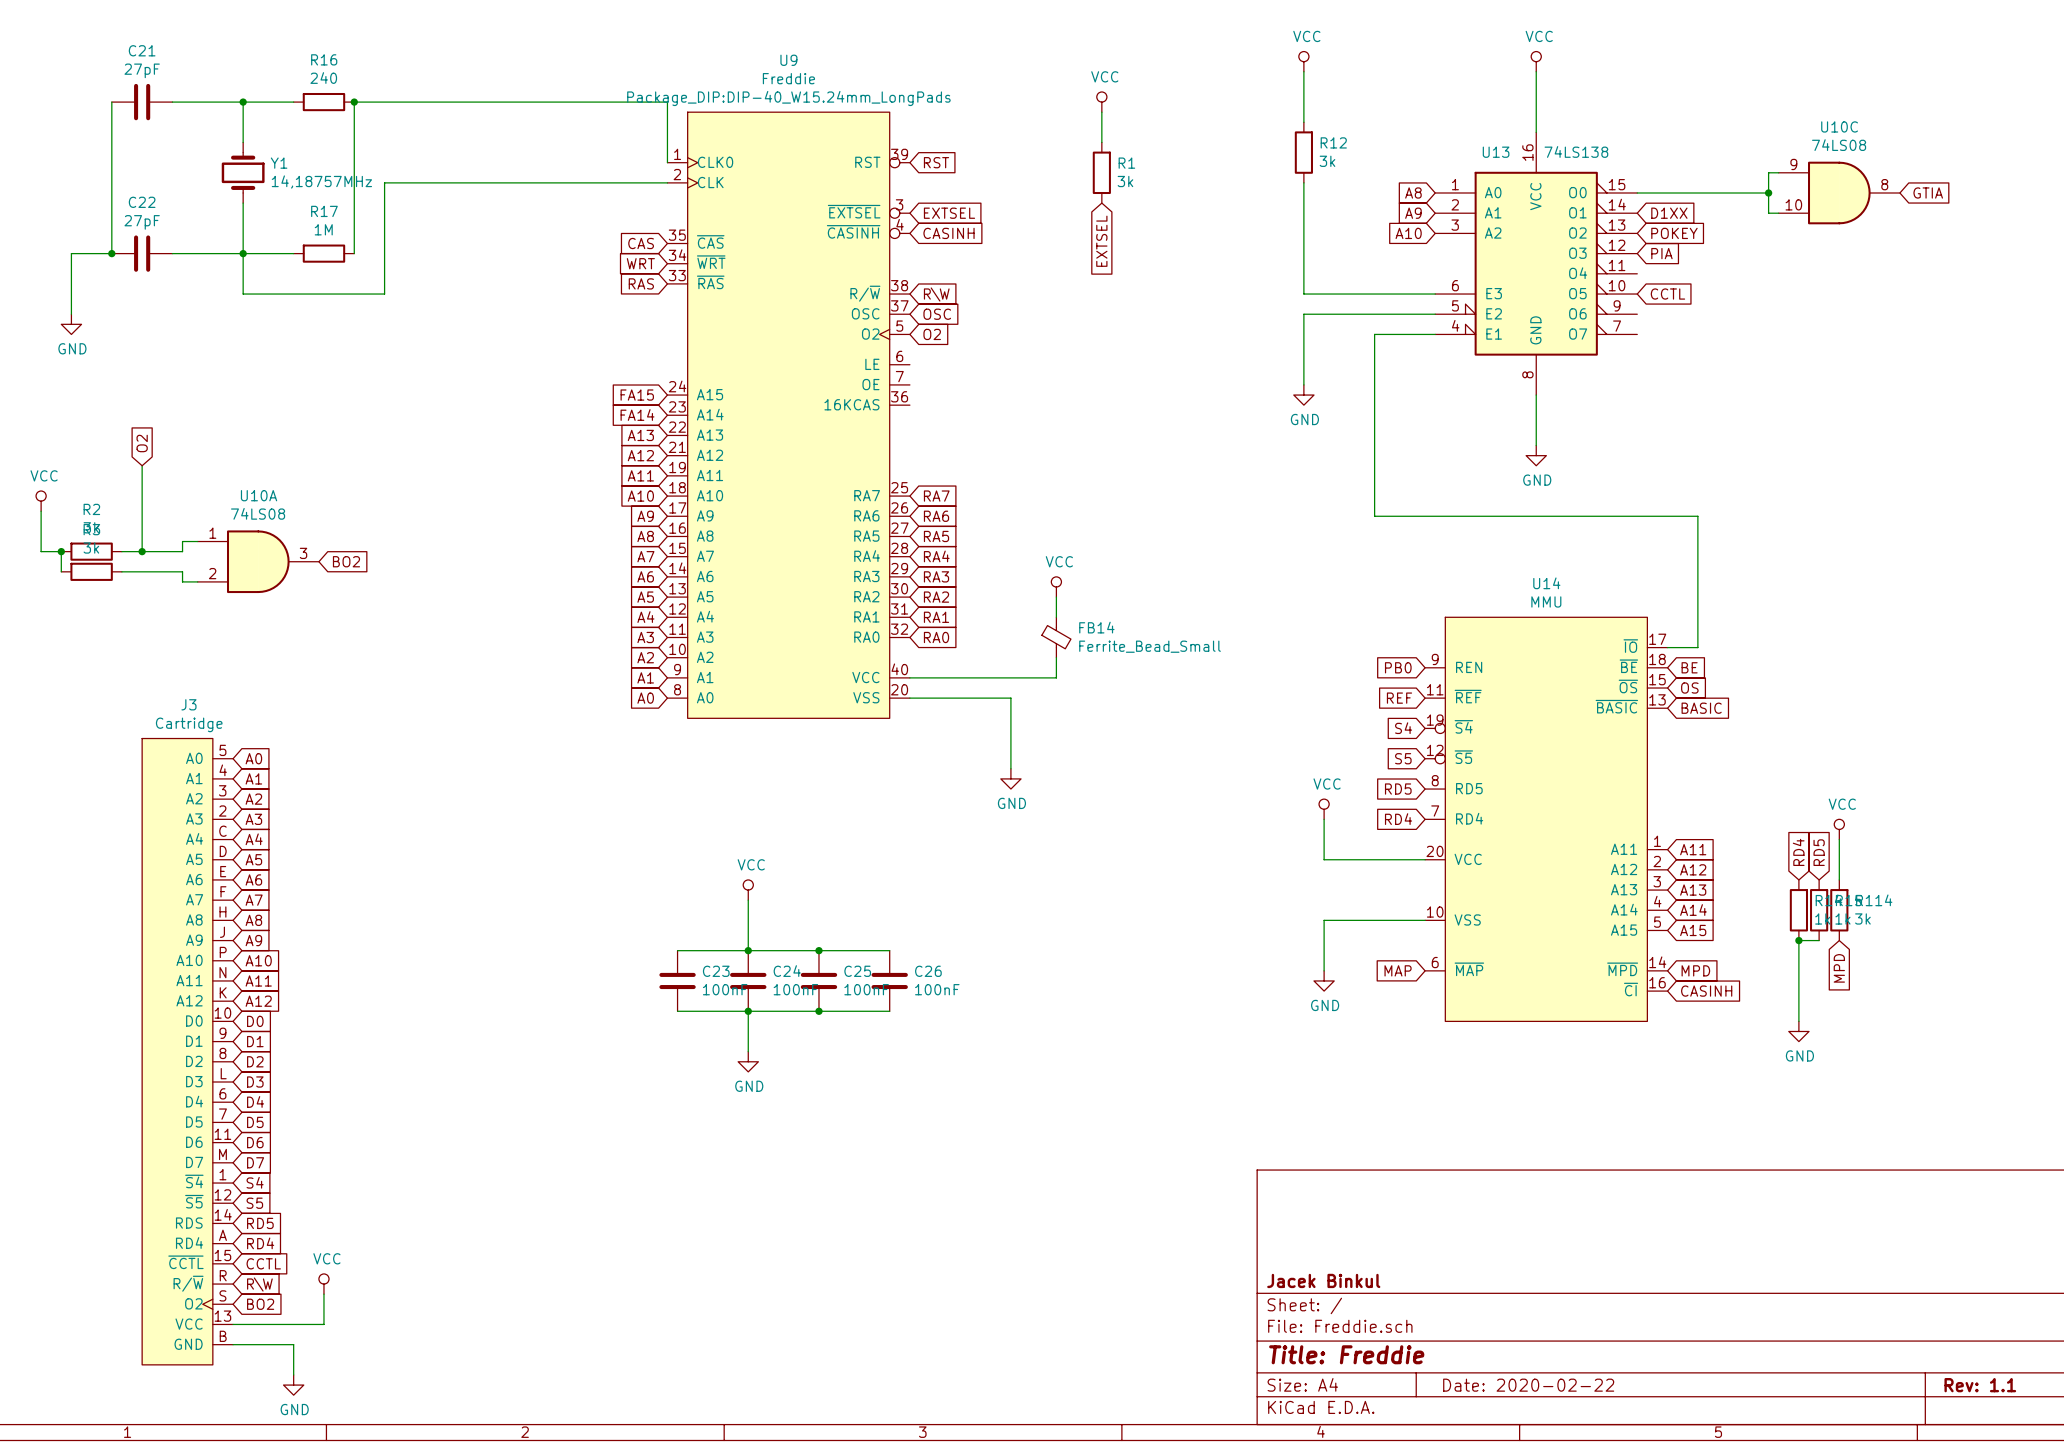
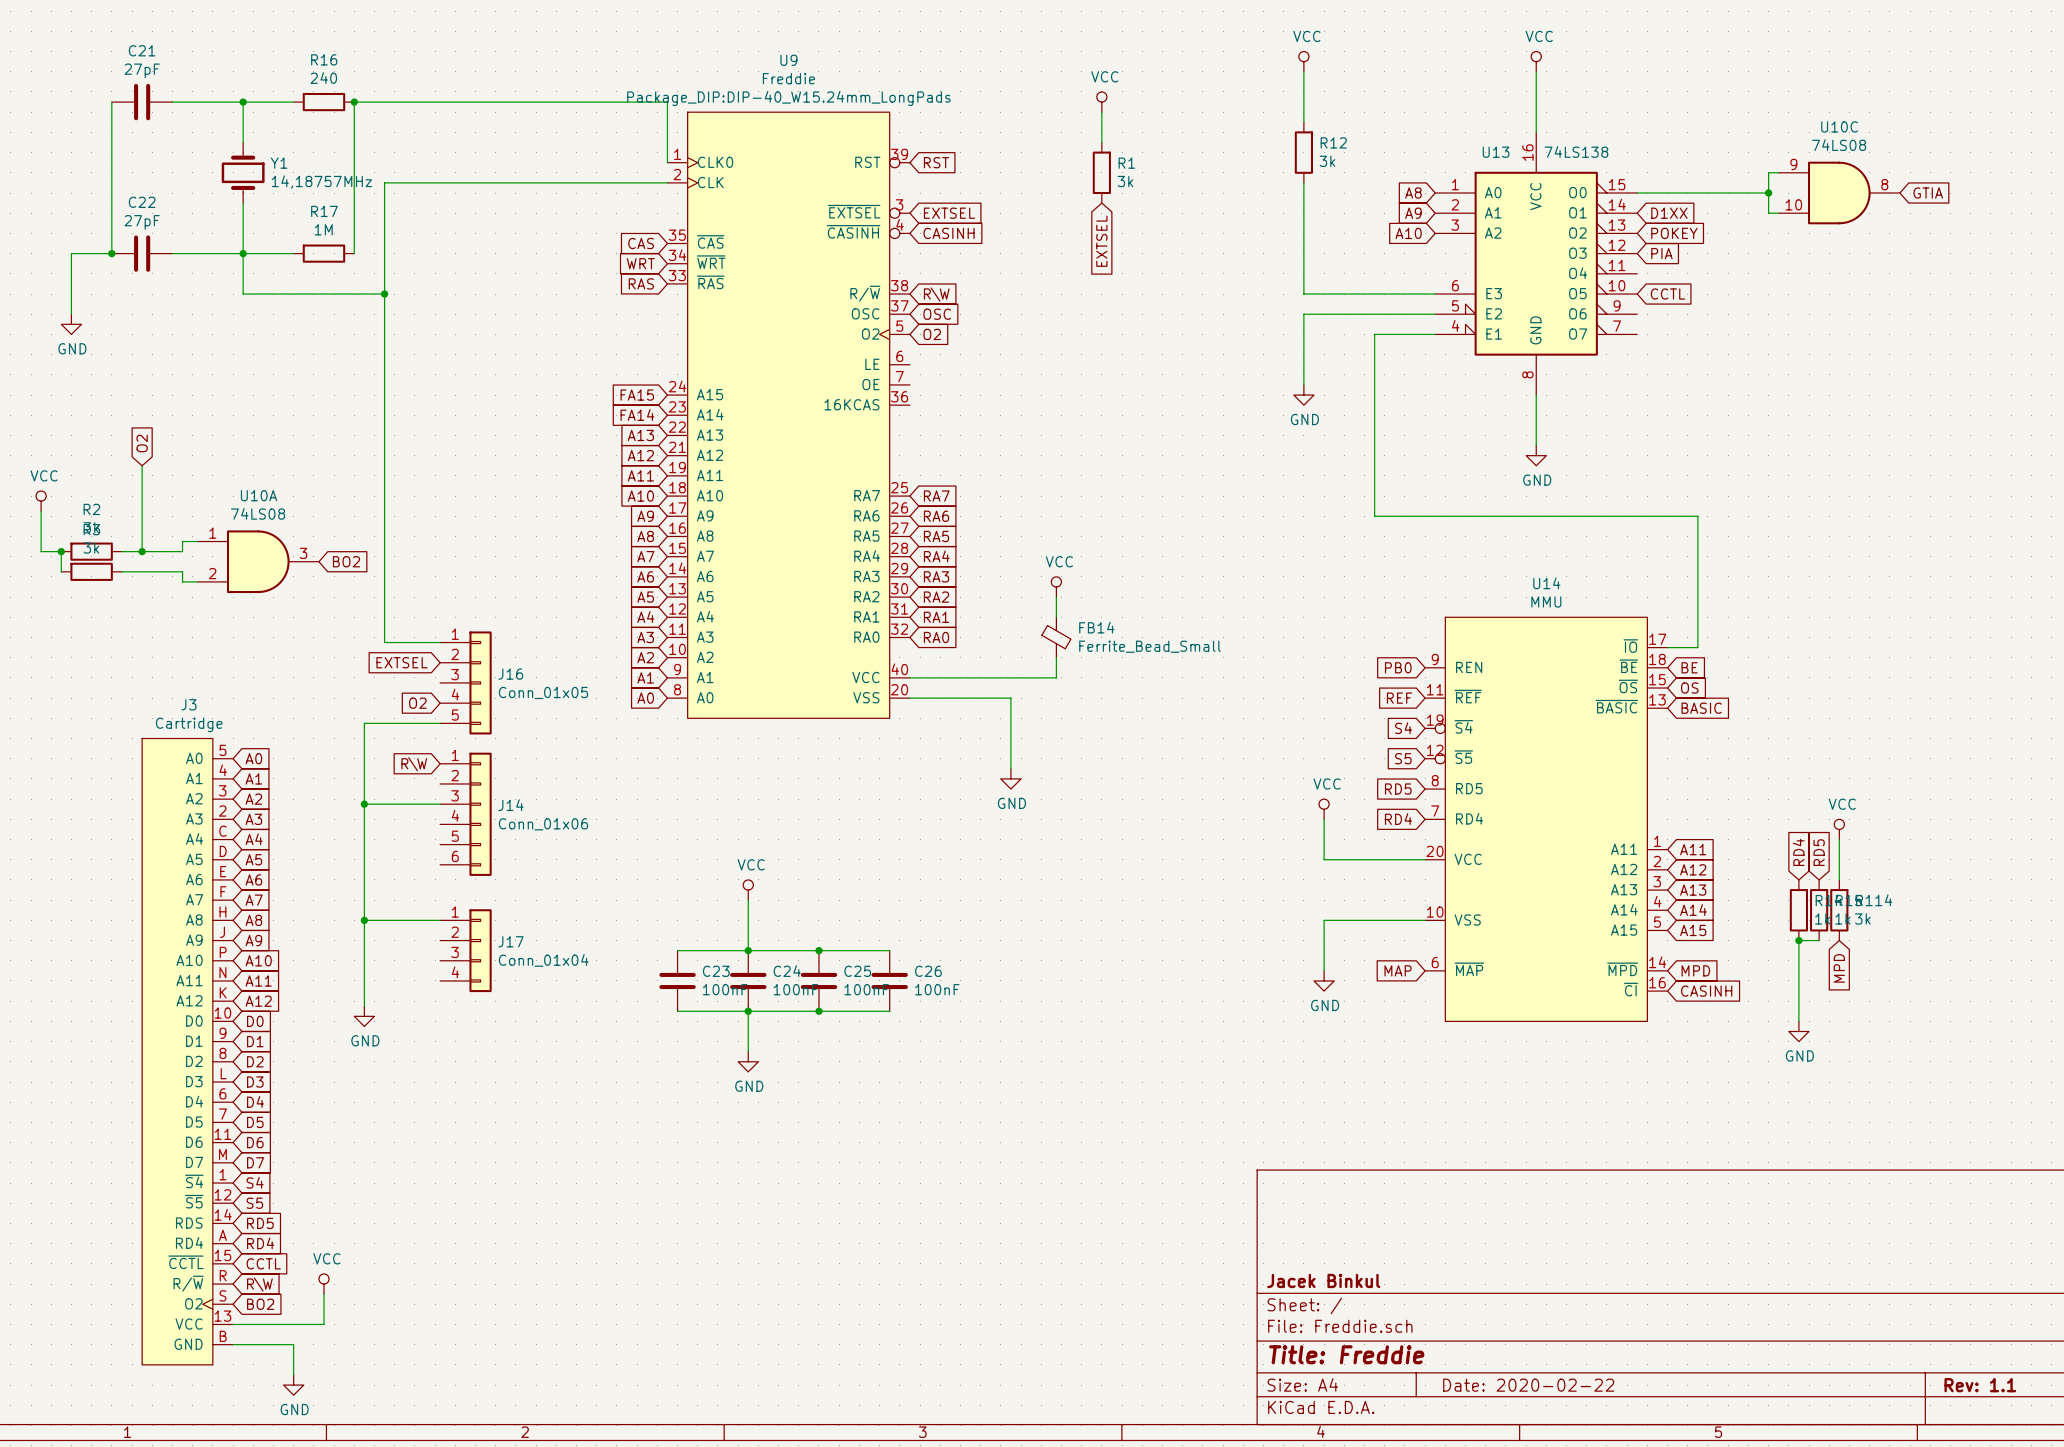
wire: none -> (384, 294) (384, 642) (440, 642)
junction: none -> (384, 294)
global label: none -> EXTSEL (402, 662)
J16: none -> Conn_01x05 (465, 682)
global label: none -> O2 (417, 703)
wire: none -> (440, 723) (364, 723) (364, 1006)
global label: none -> R\W (414, 764)
wire: none -> (364, 804) (440, 804)
junction: none -> (364, 804)
J14: none -> Conn_01x06 (465, 814)
wire: none -> (364, 920) (440, 920)
junction: none -> (364, 920)
J17: none -> Conn_01x04 (465, 950)
power symbol: none -> GND (364, 1016)

